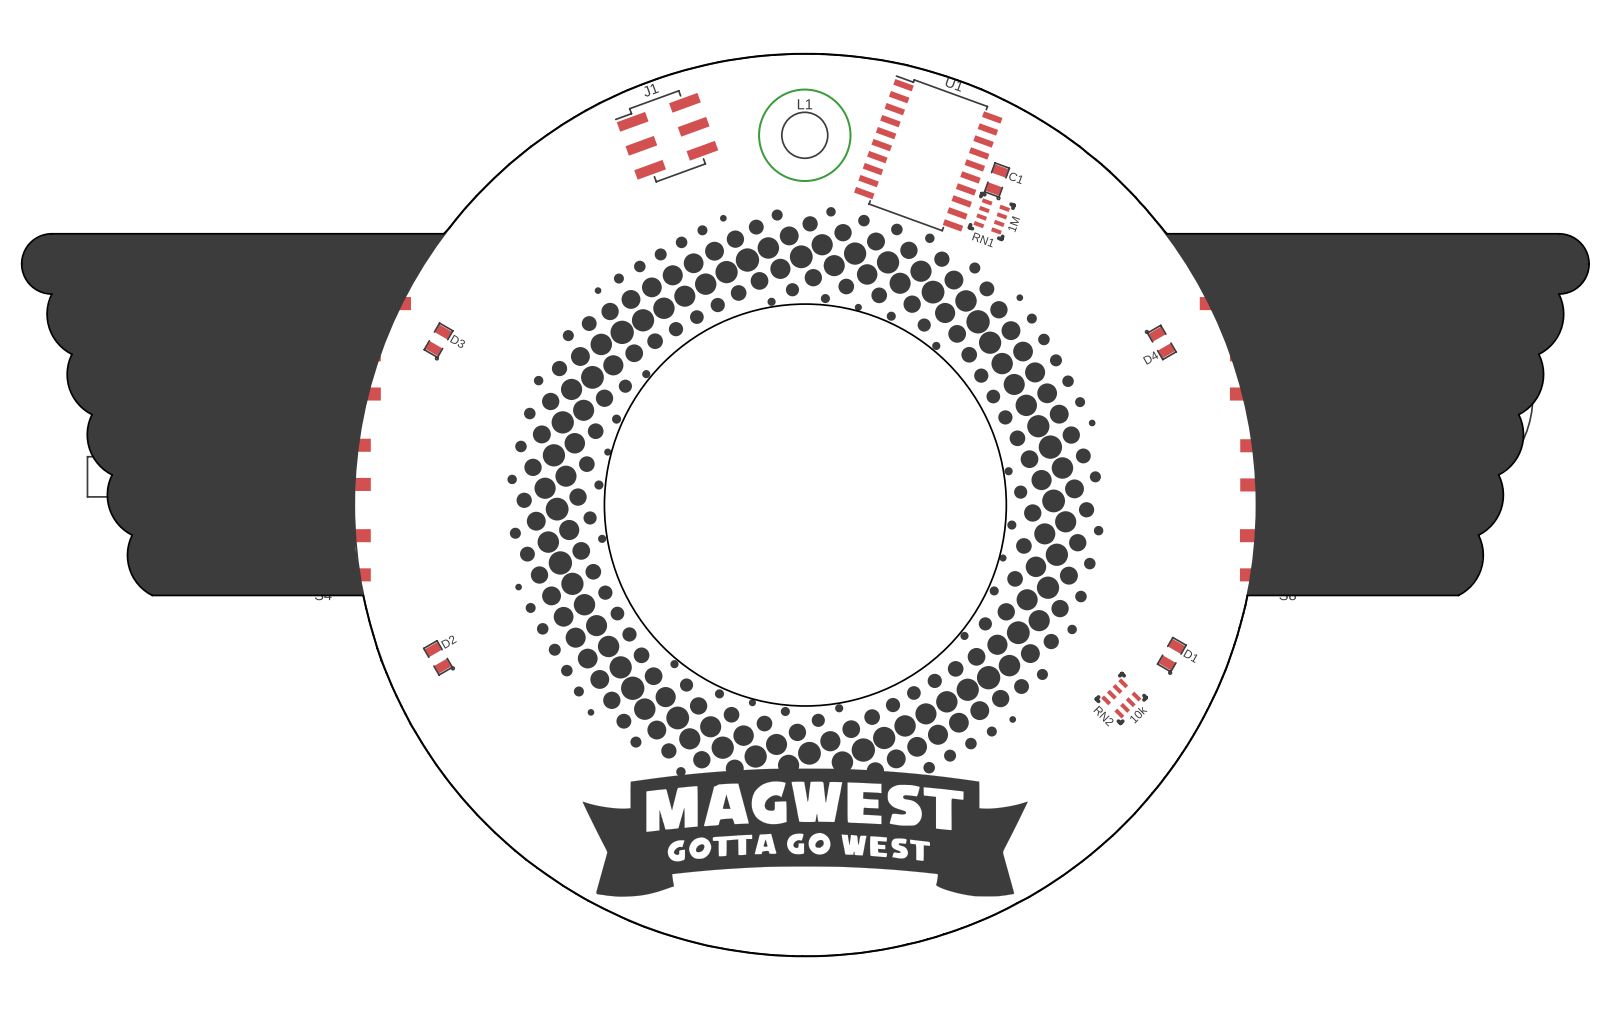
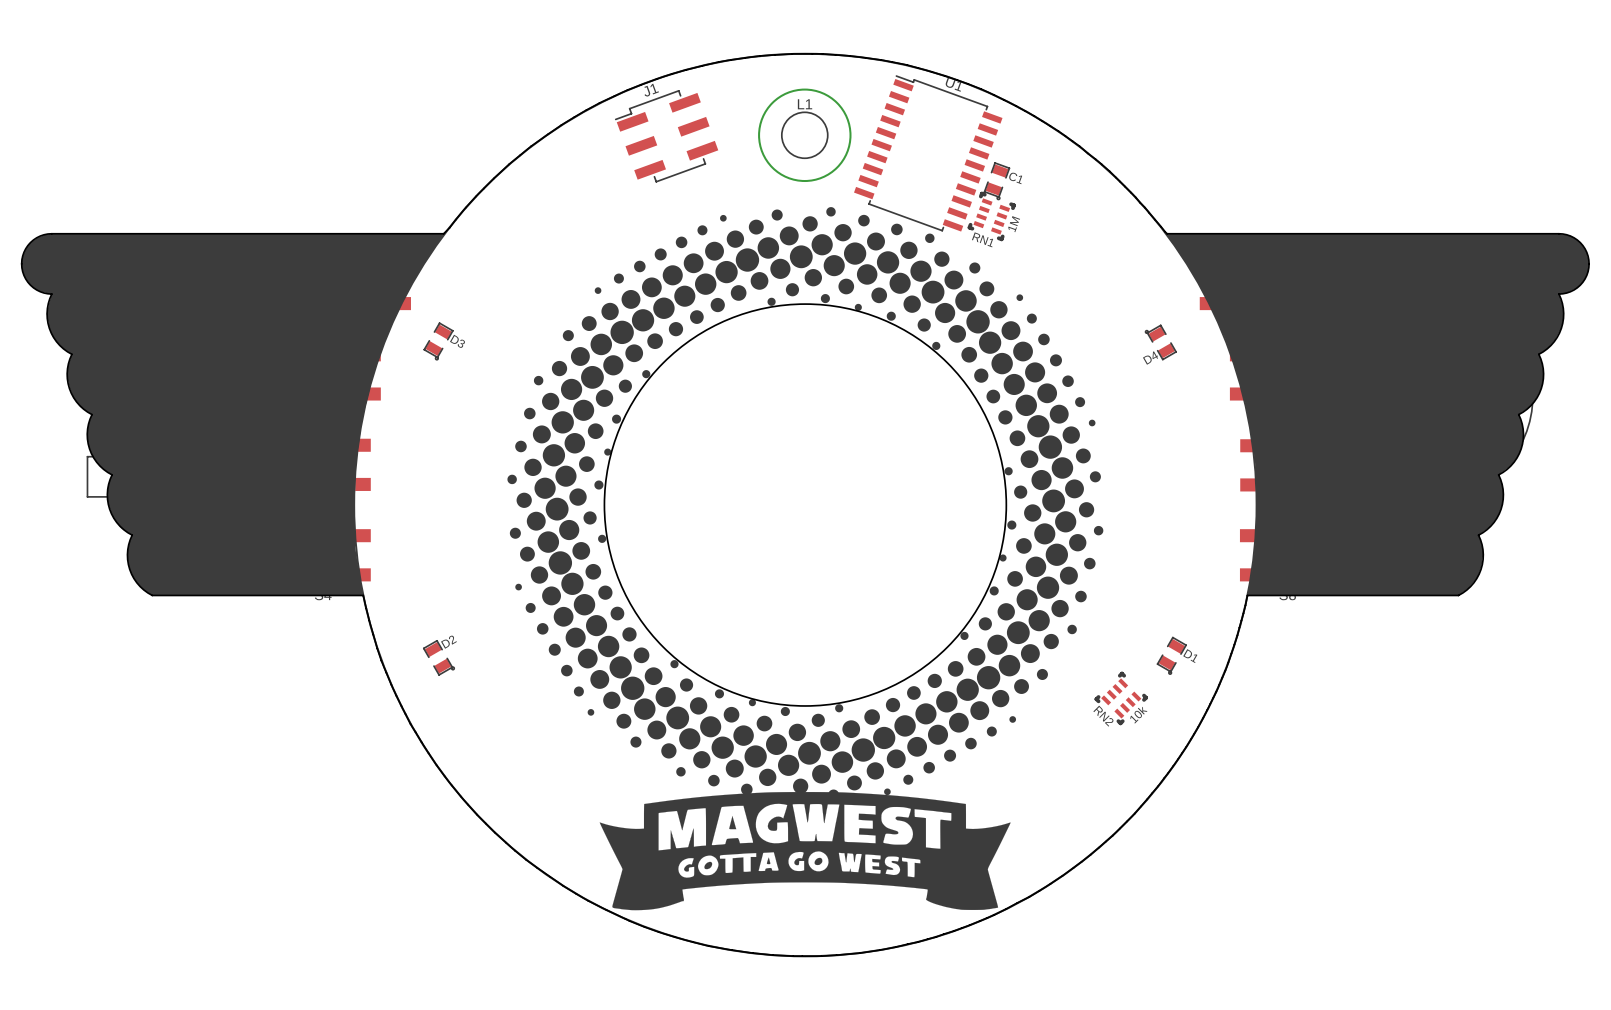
drawing shape: [507, 207, 1104, 787] -> [507, 207, 1104, 803]
drawing: [582, 768, 1028, 897] -> none
drawing: none -> [599, 792, 1011, 911]

